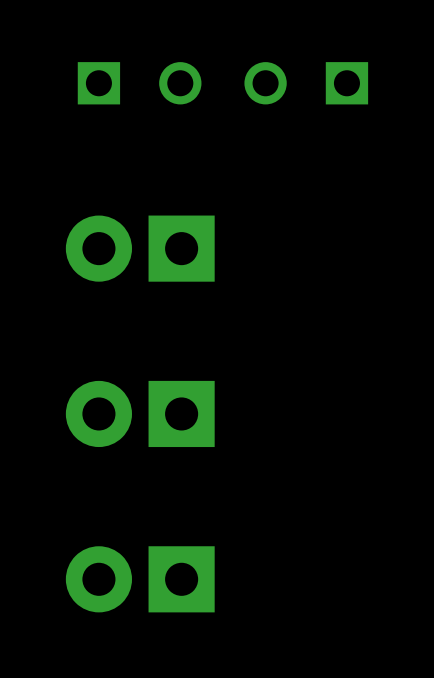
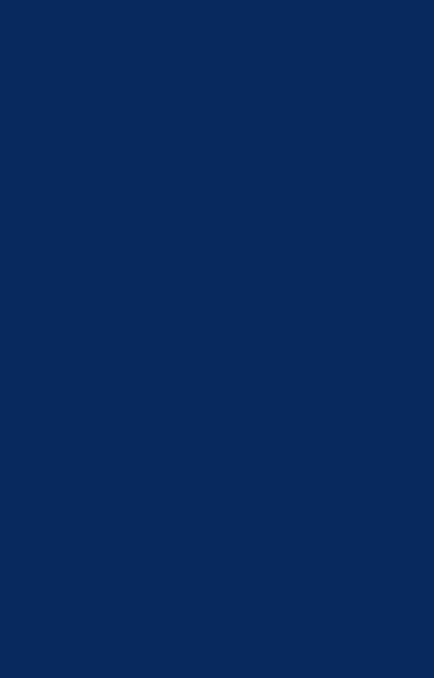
part: (139, 83) -> none
part: (306, 83) -> none
part: (140, 248) -> none
part: (140, 413) -> none
part: (140, 579) -> none

